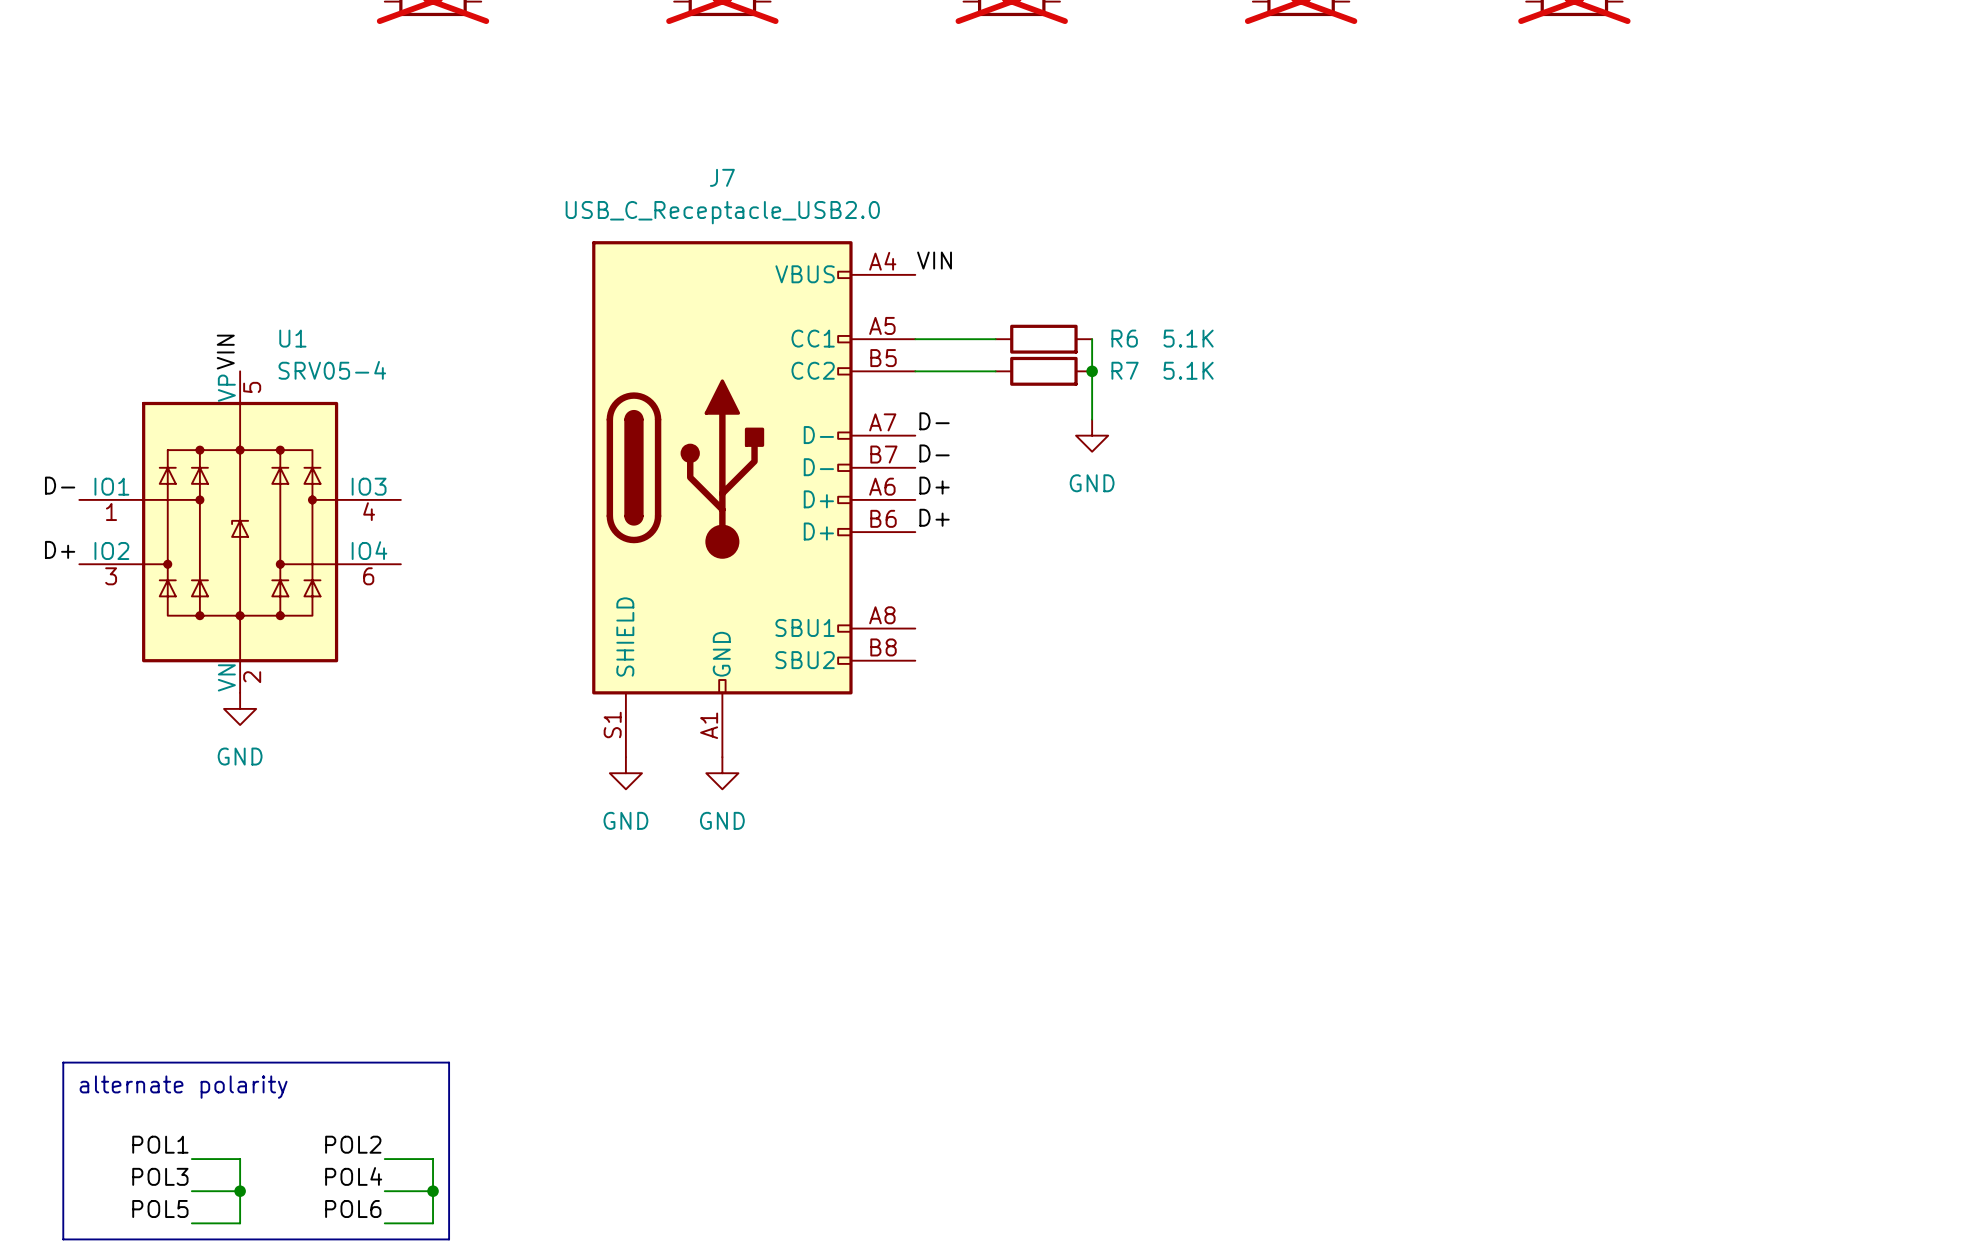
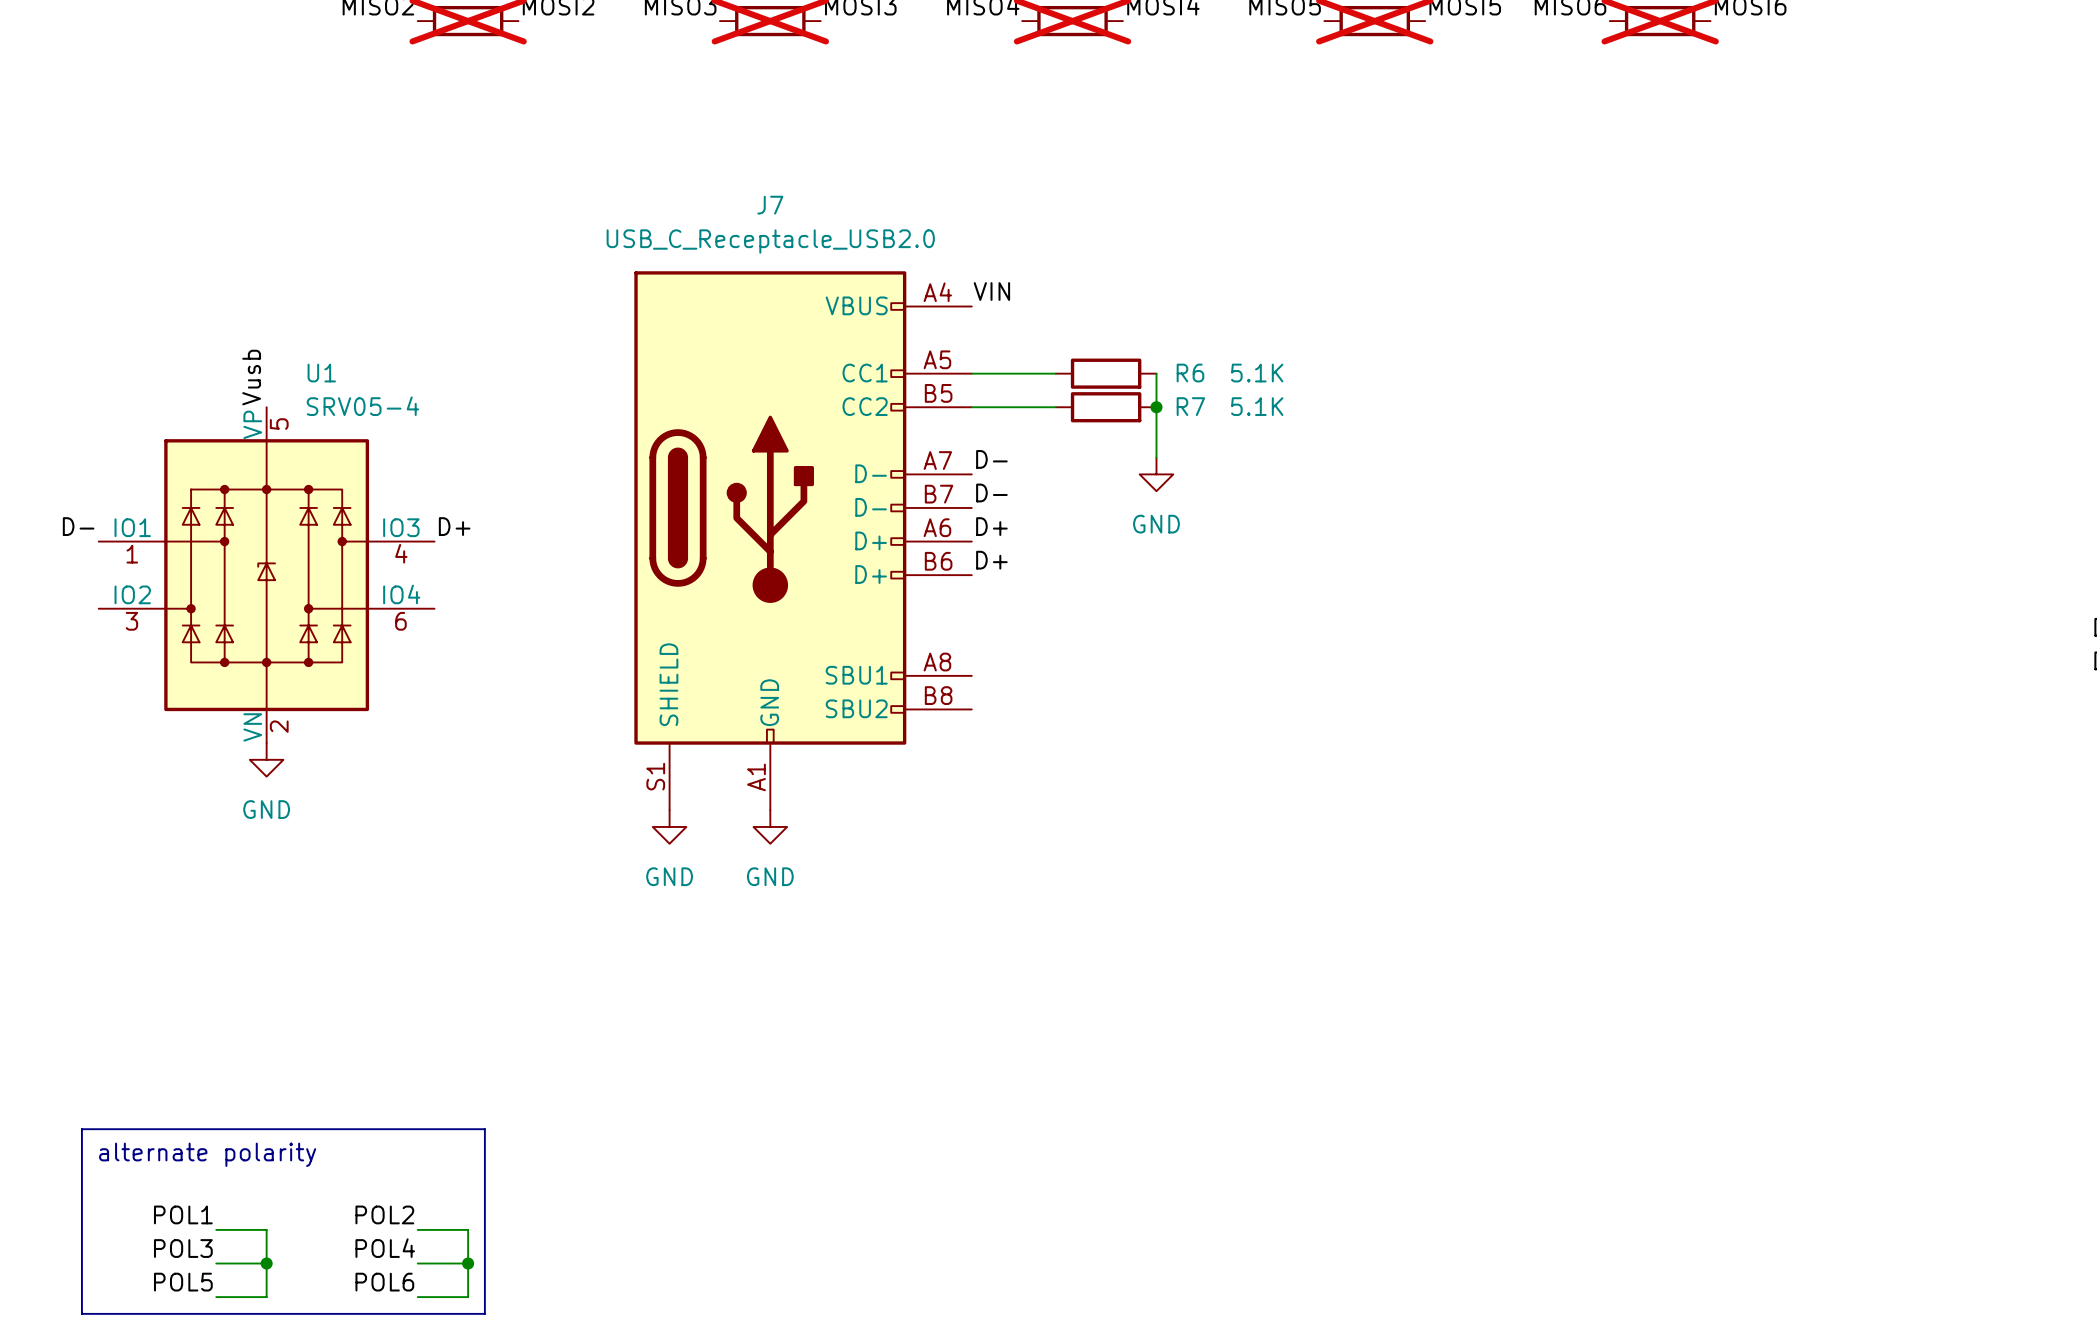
label: VIN (225, 352) -> Vusb (251, 377)
label: none -> D+ (454, 526)
label: D+ (60, 549) -> none

